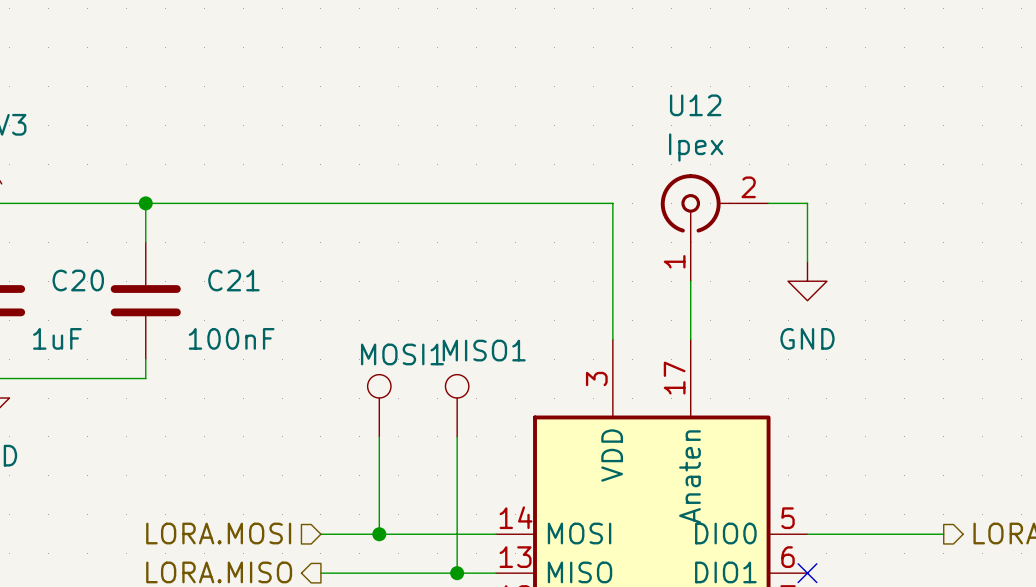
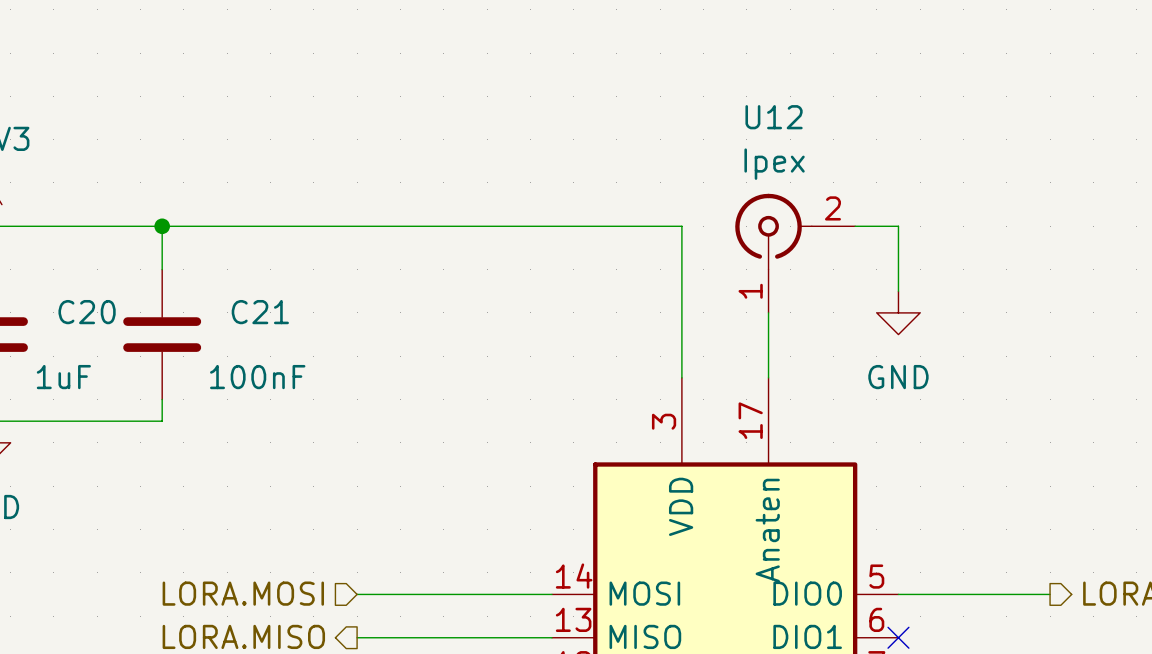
MOSI1: (379, 405) -> none
MISO1: (457, 405) -> none
wire: (379, 436) (379, 534) -> none
wire: (457, 436) (457, 573) -> none
junction: (379, 534) -> none
junction: (457, 573) -> none

